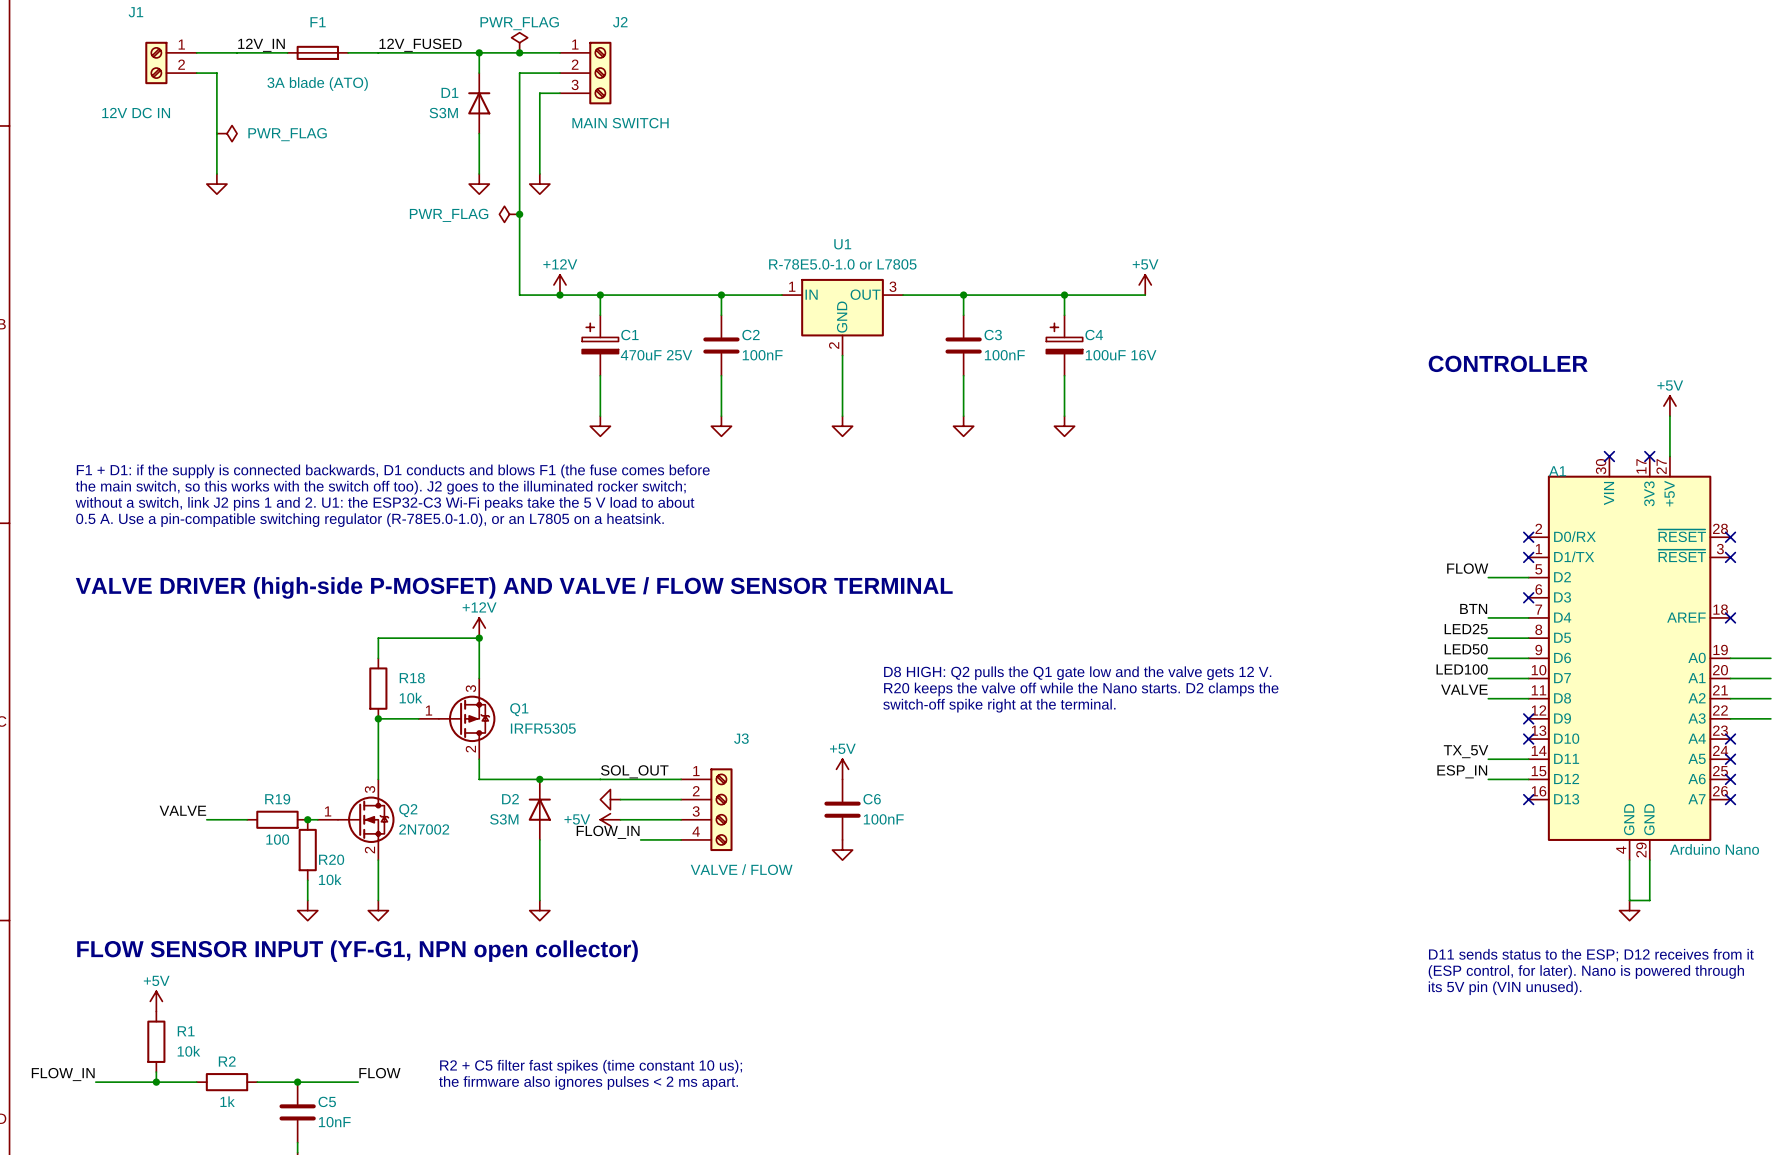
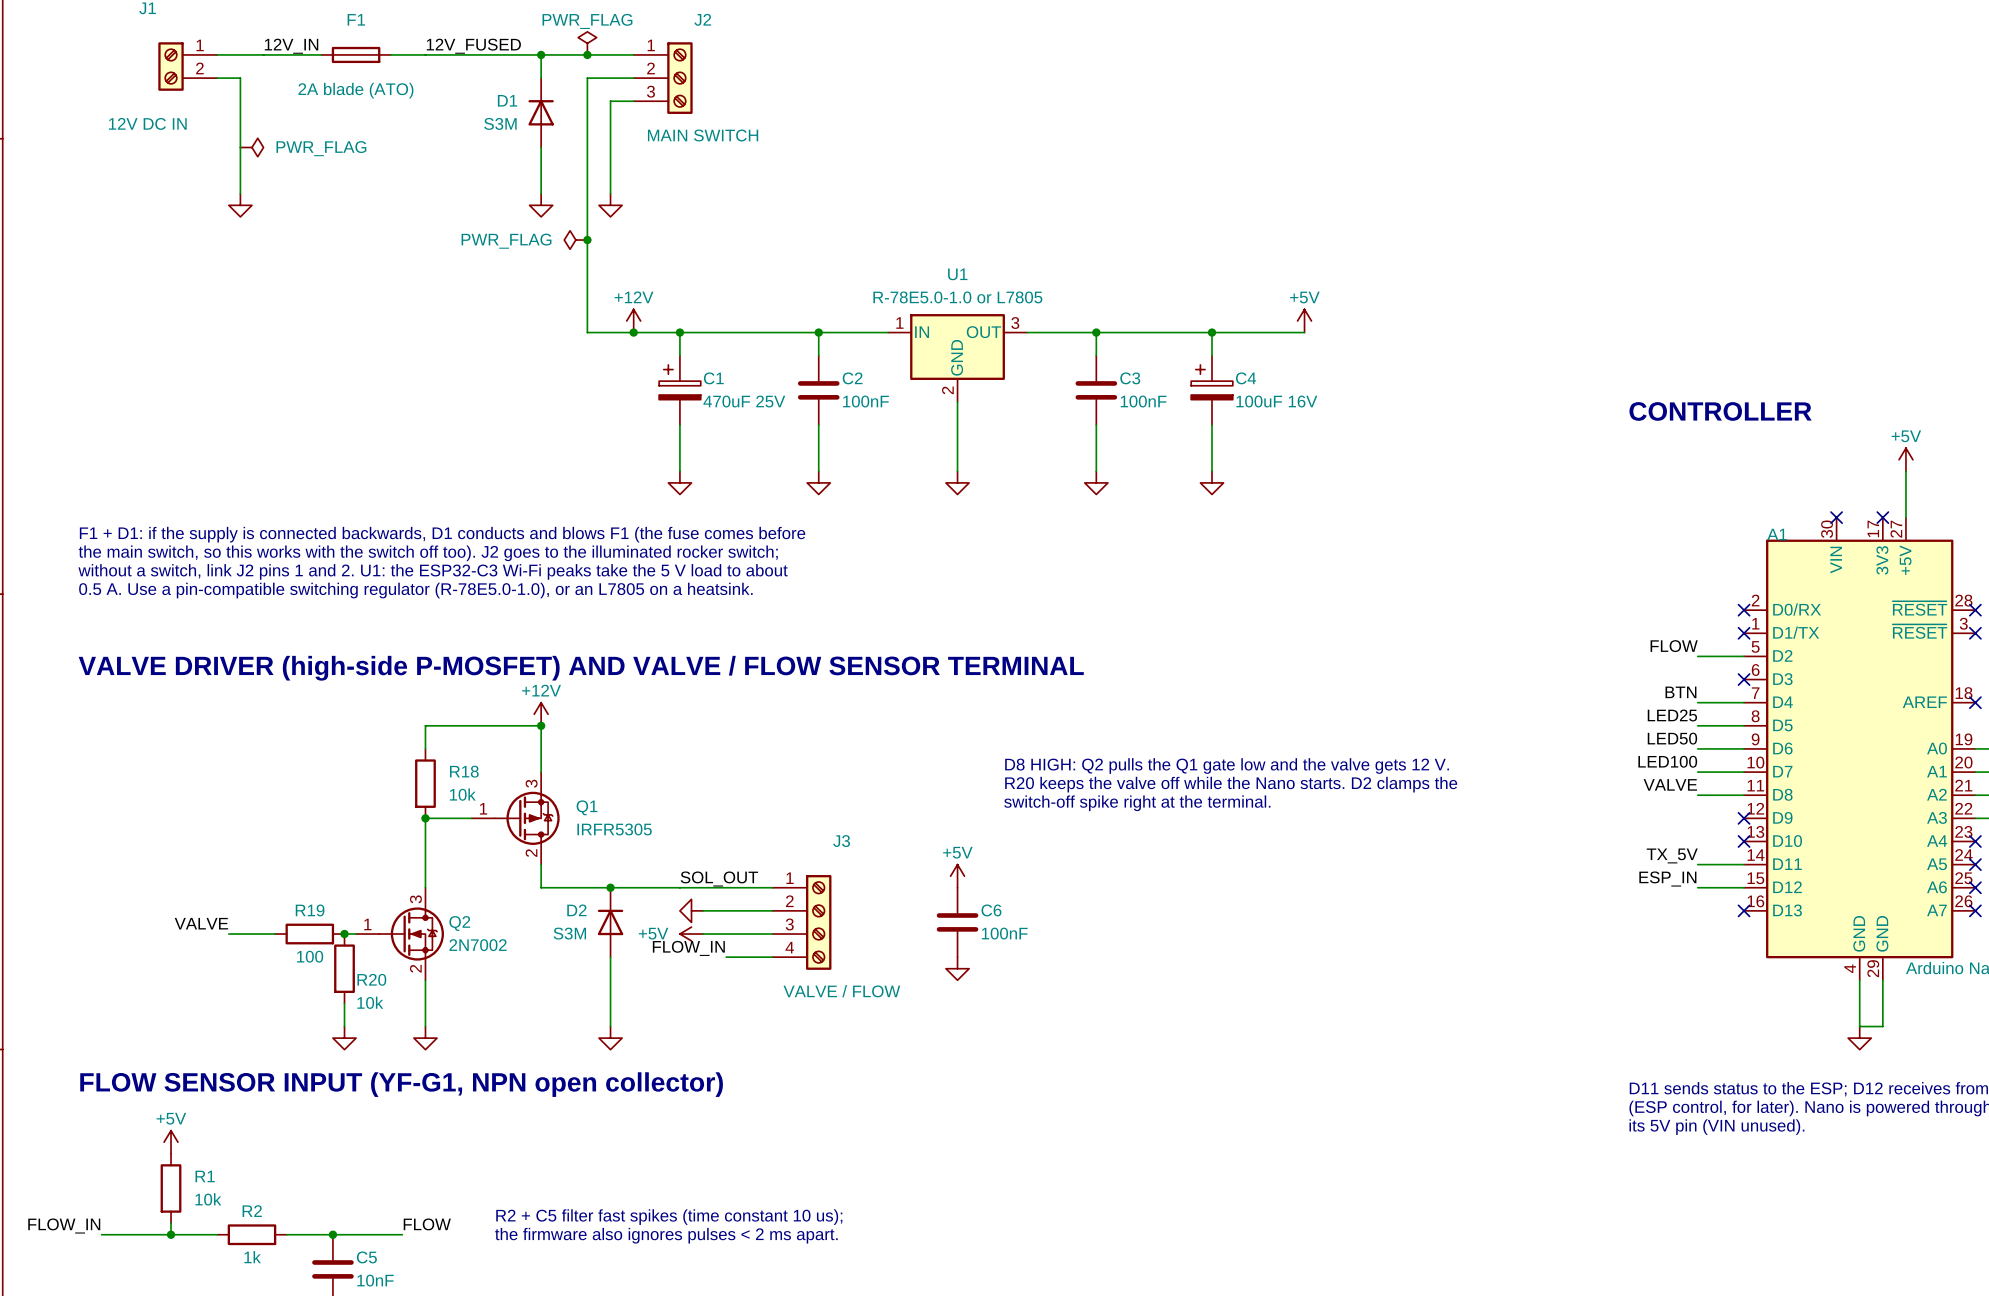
F1 value: 3A blade (ATO) (317, 84) -> 2A blade (ATO) (355, 90)

